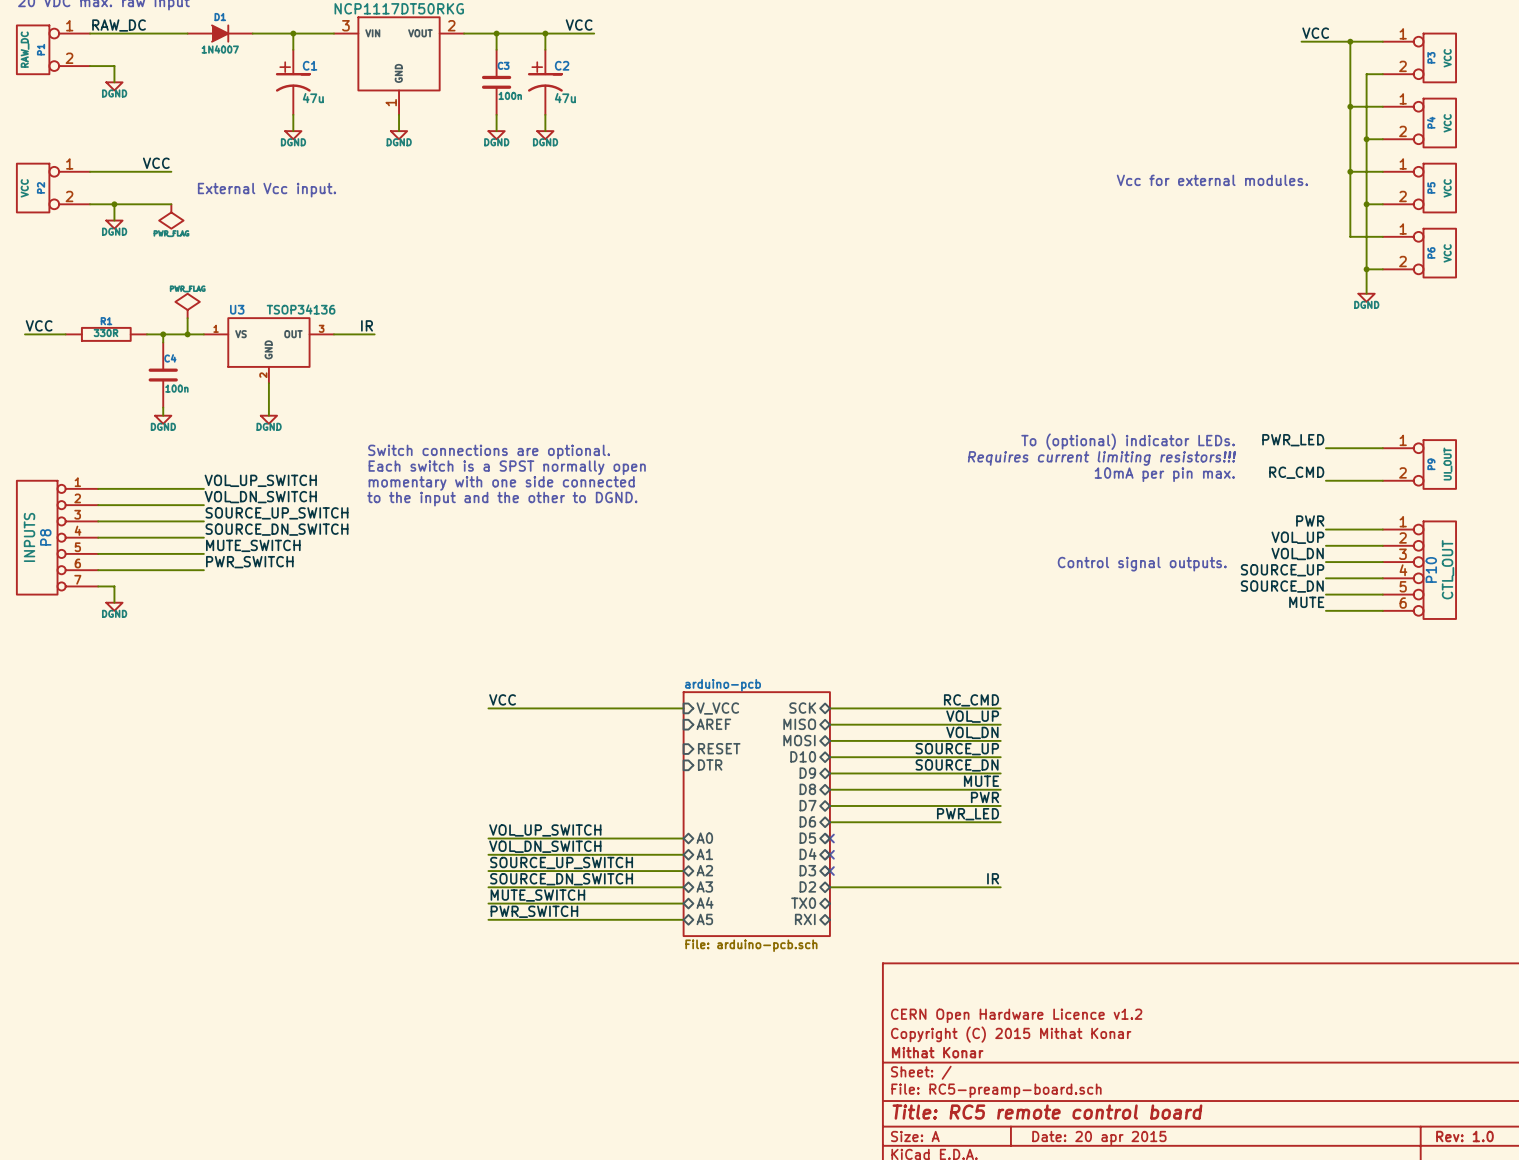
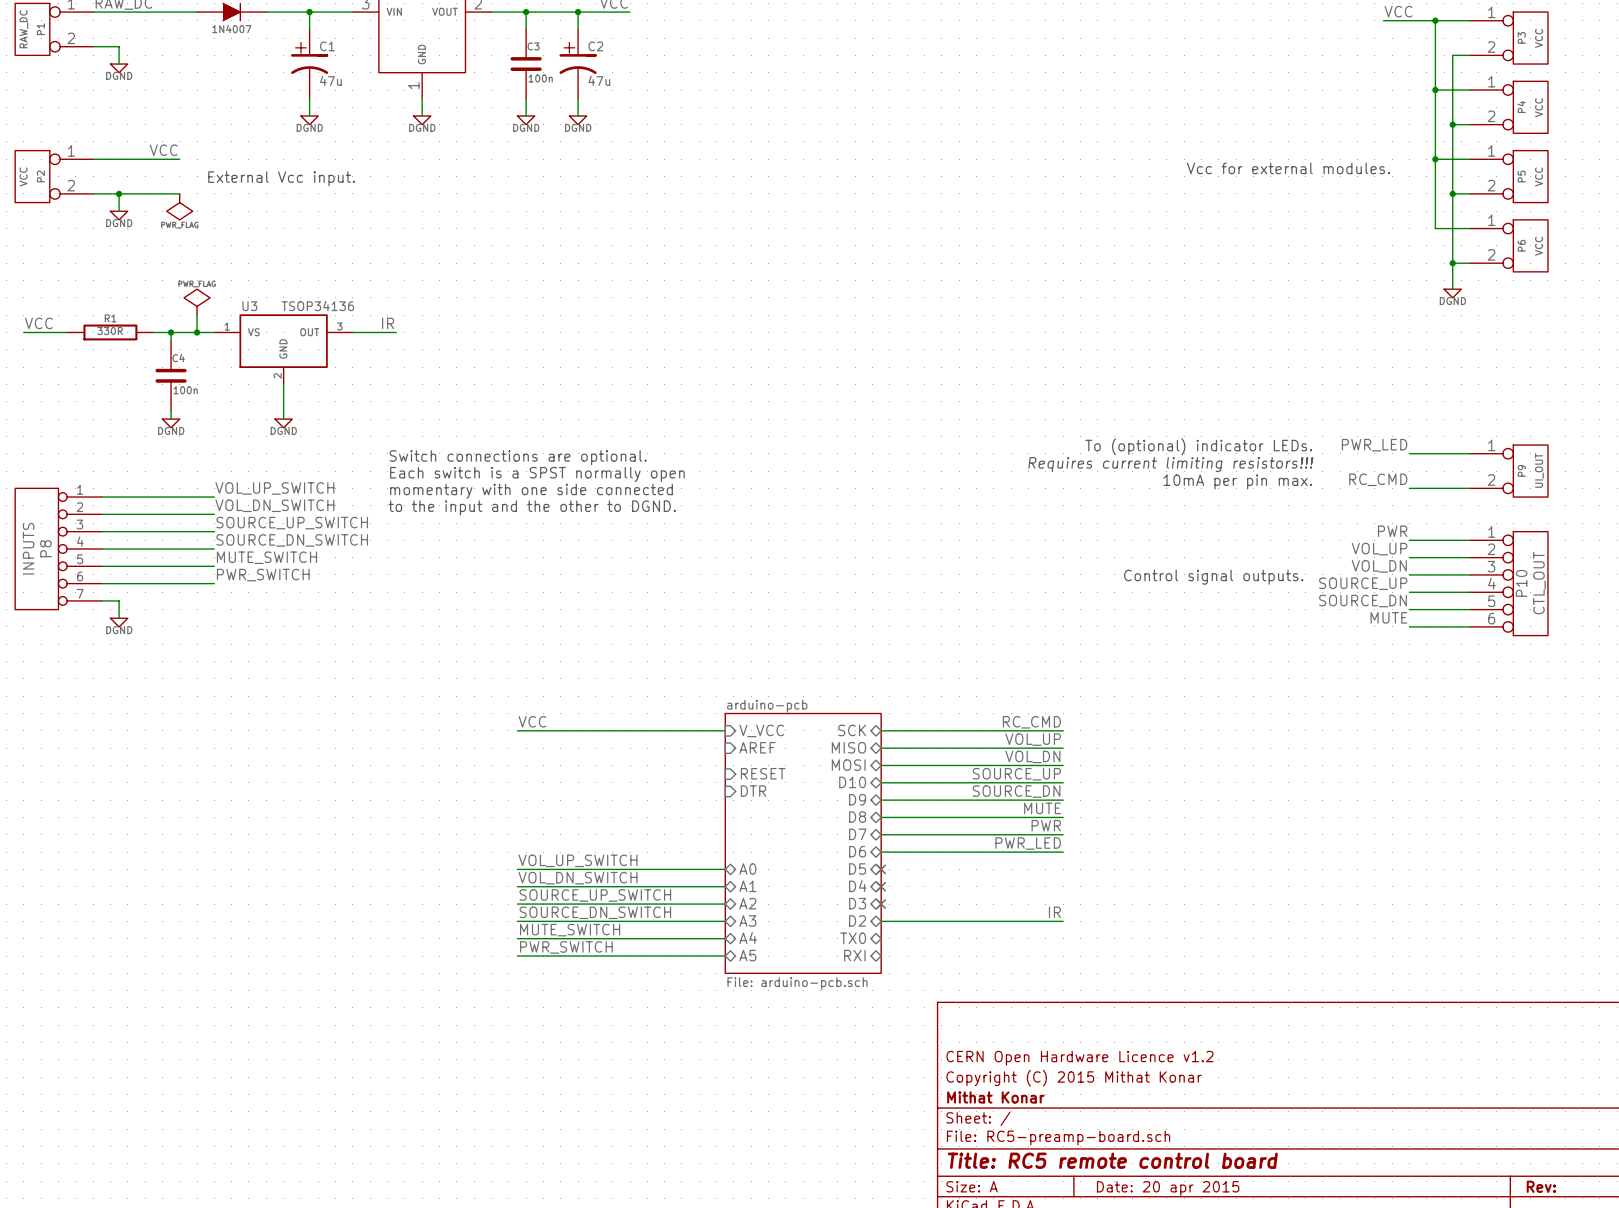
title block: Rev: 1.0 (1464, 1136) -> Rev: (1541, 1186)

